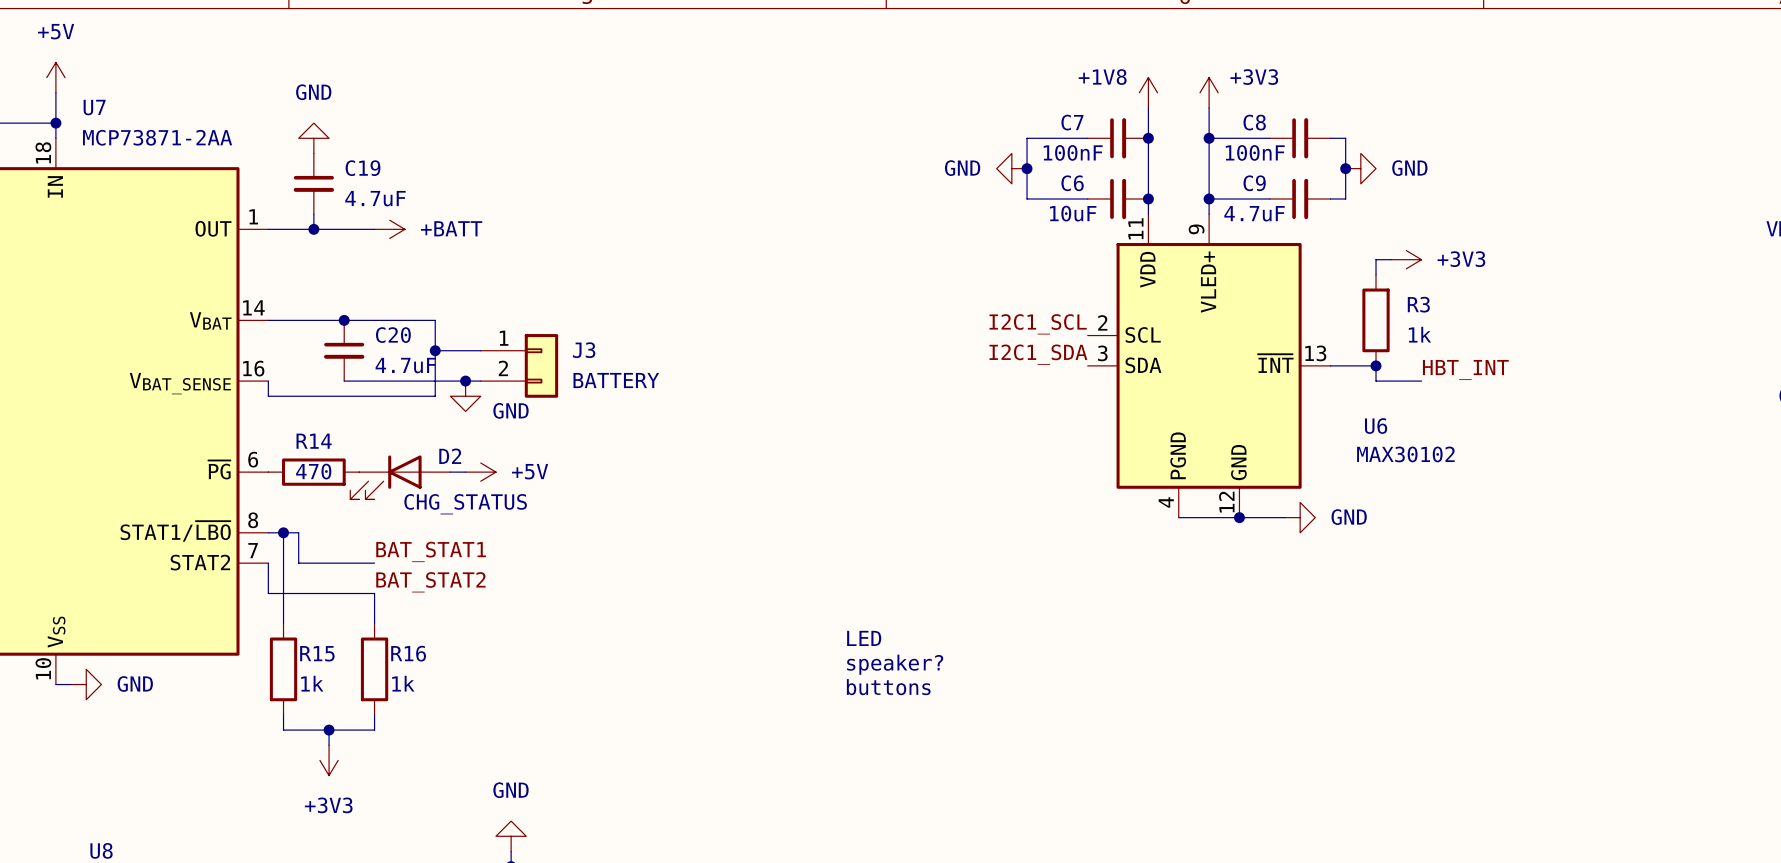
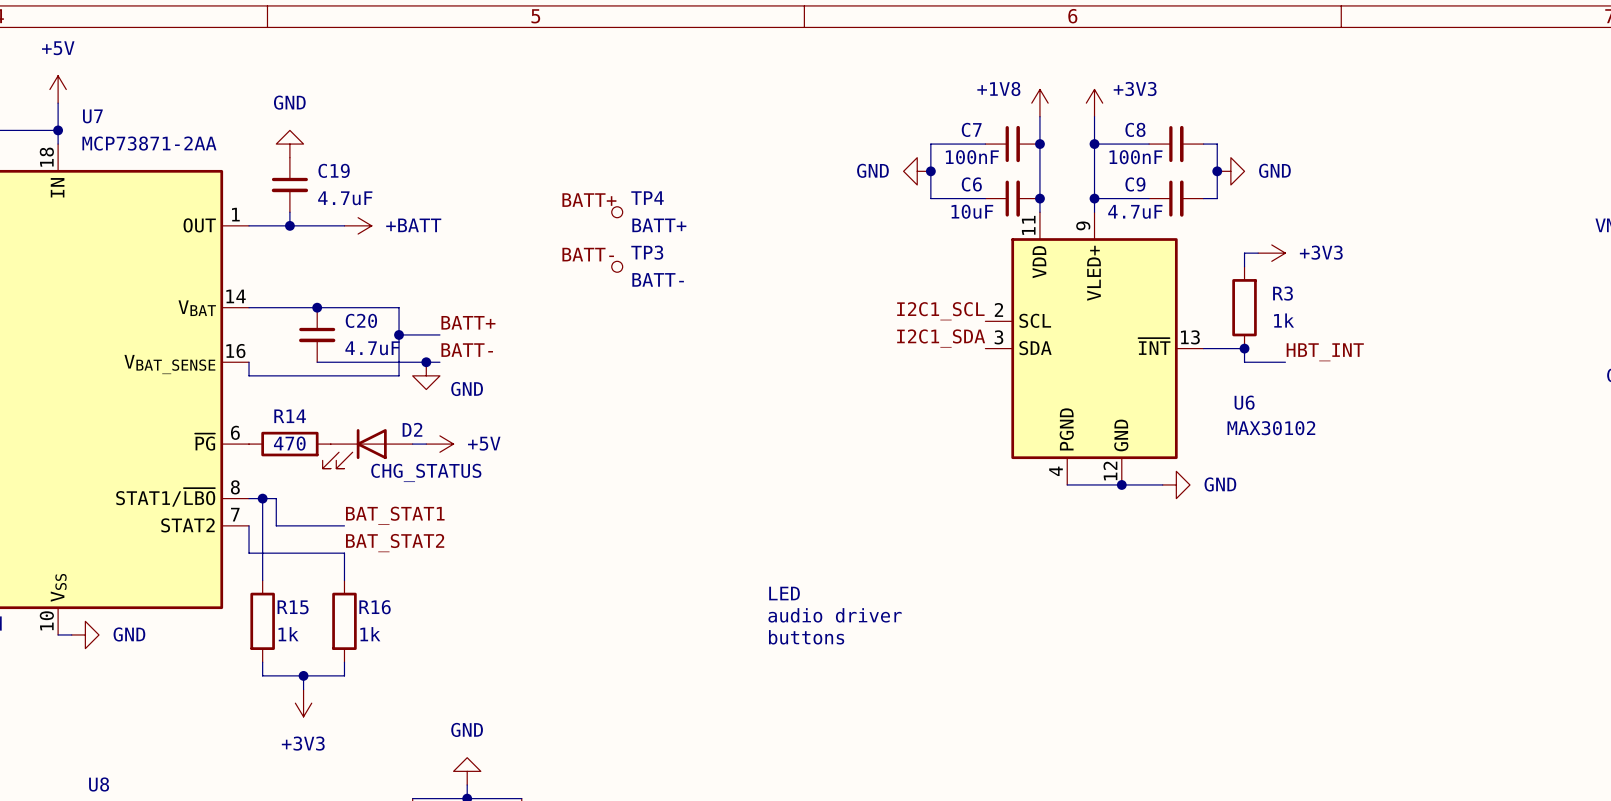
label: none -> BATT+ (589, 200)
TP4: none -> BATT+ (617, 212)
label: none -> BATT- (588, 254)
TP3: none -> BATT- (617, 266)
label: none -> BATT+ (468, 322)
J3: BATTERY (519, 365) -> none
label: none -> BATT- (467, 350)
text: speaker? (895, 664) -> audio driver (835, 615)

